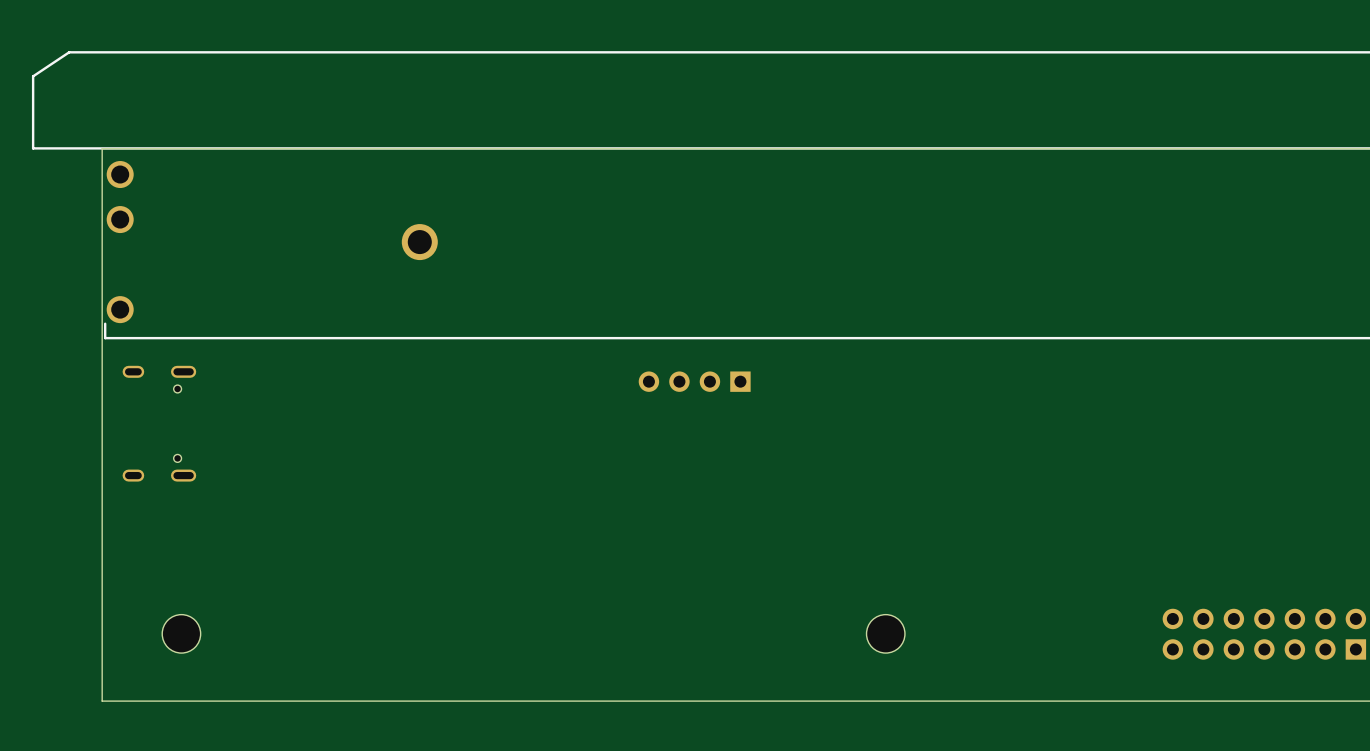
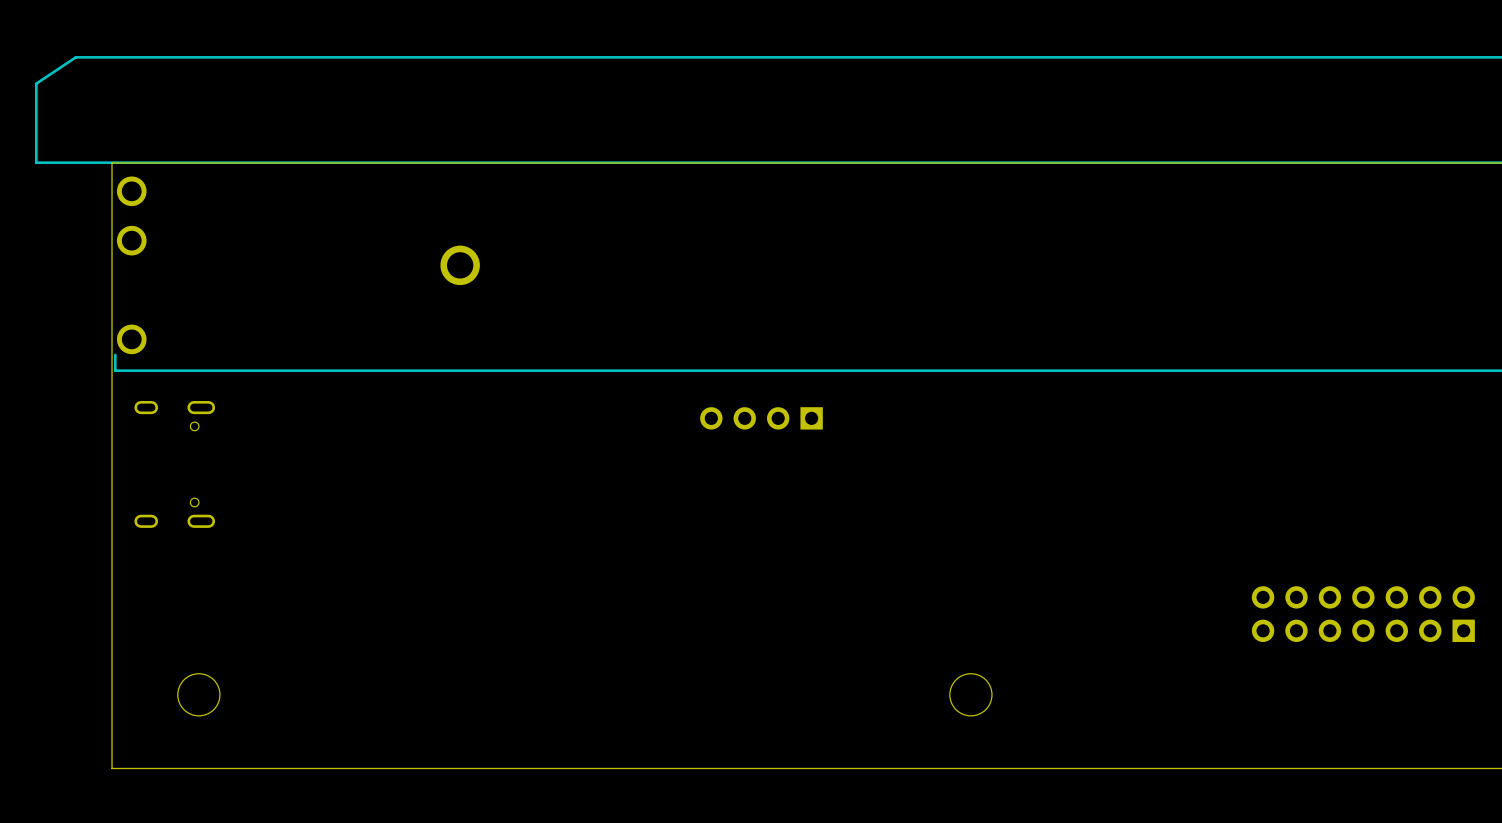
part position: (1264, 634) -> (1363, 614)

